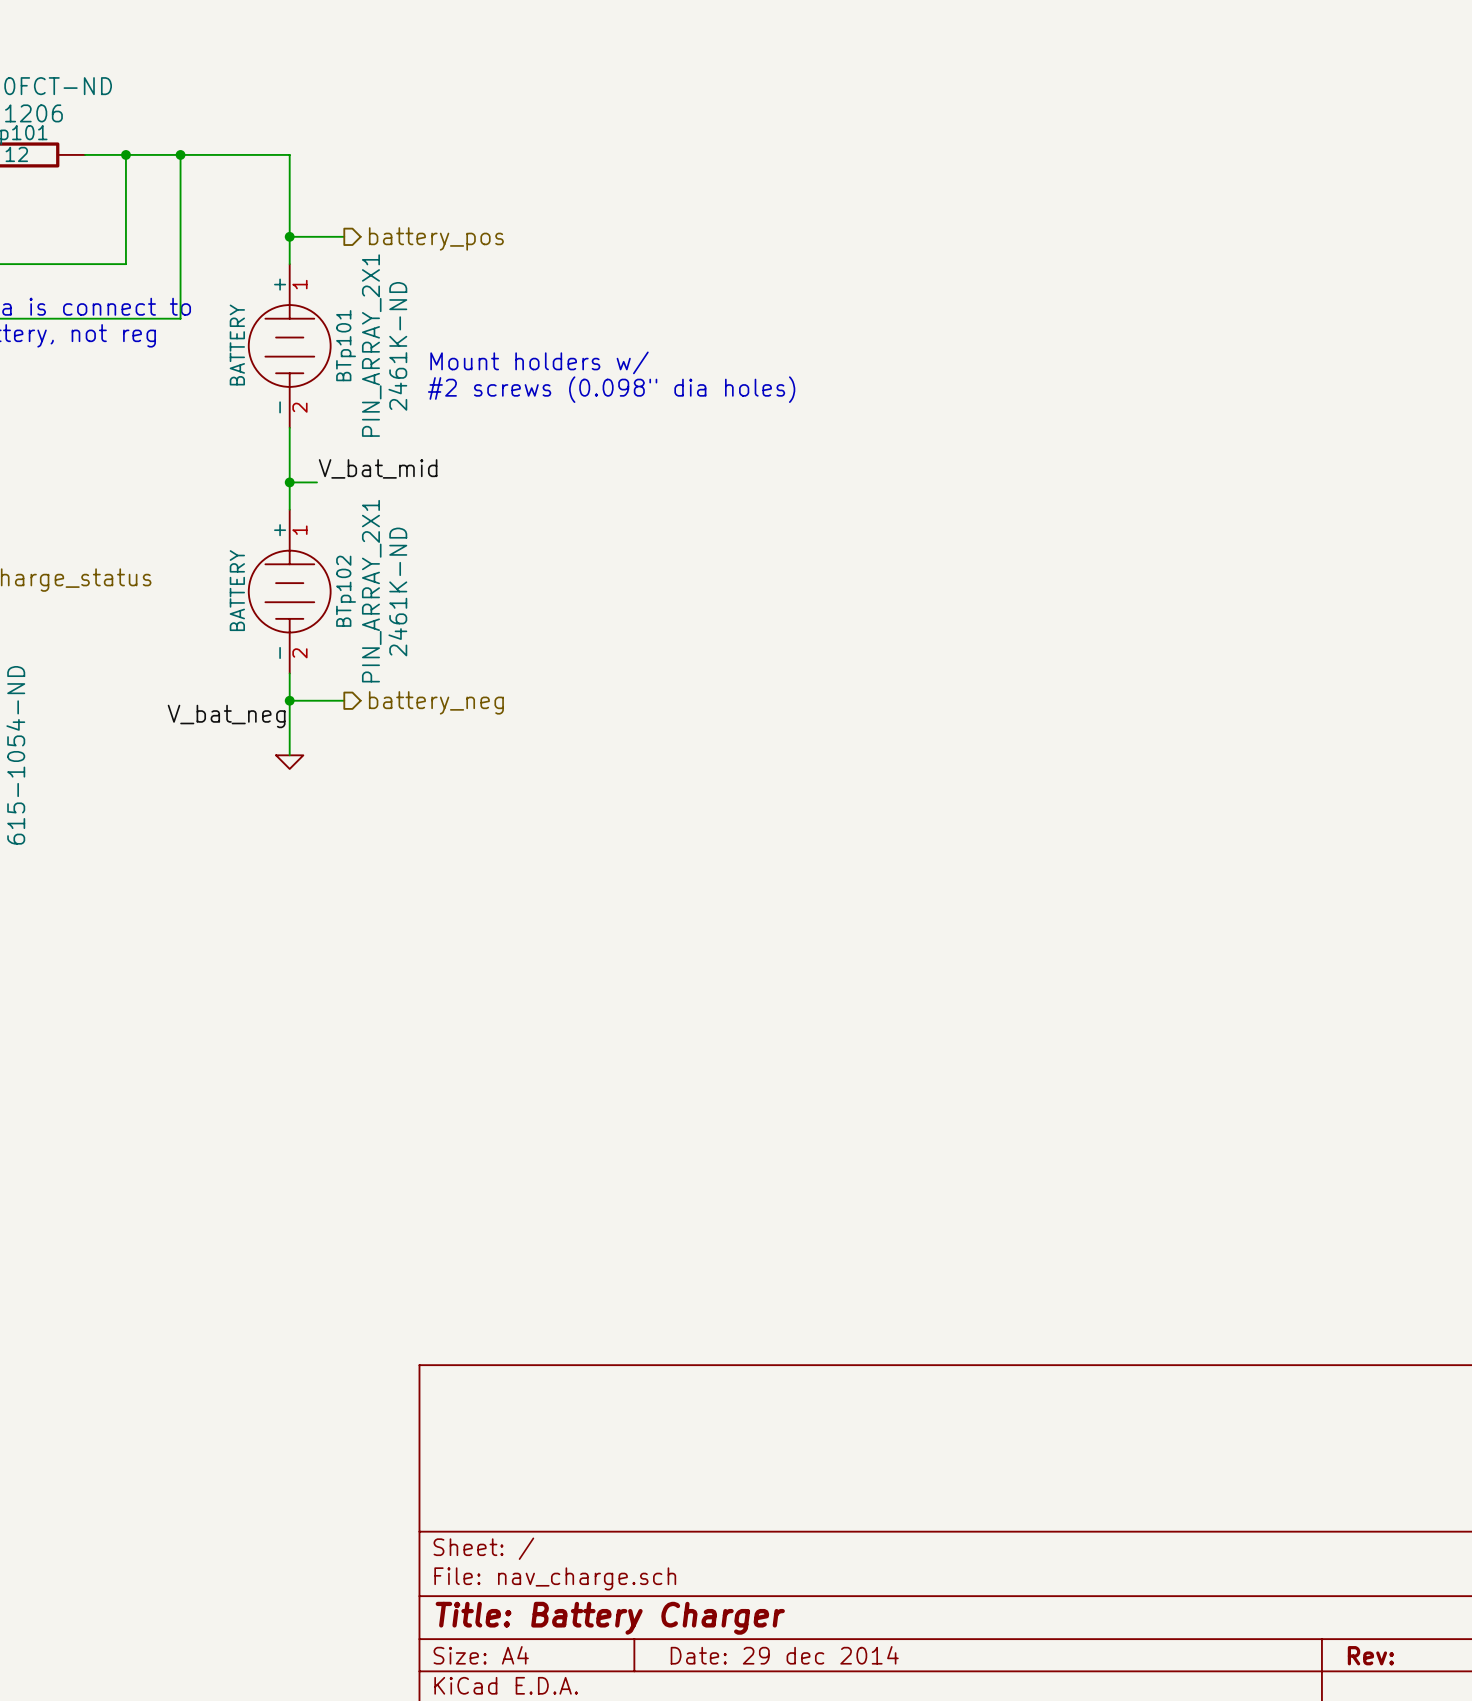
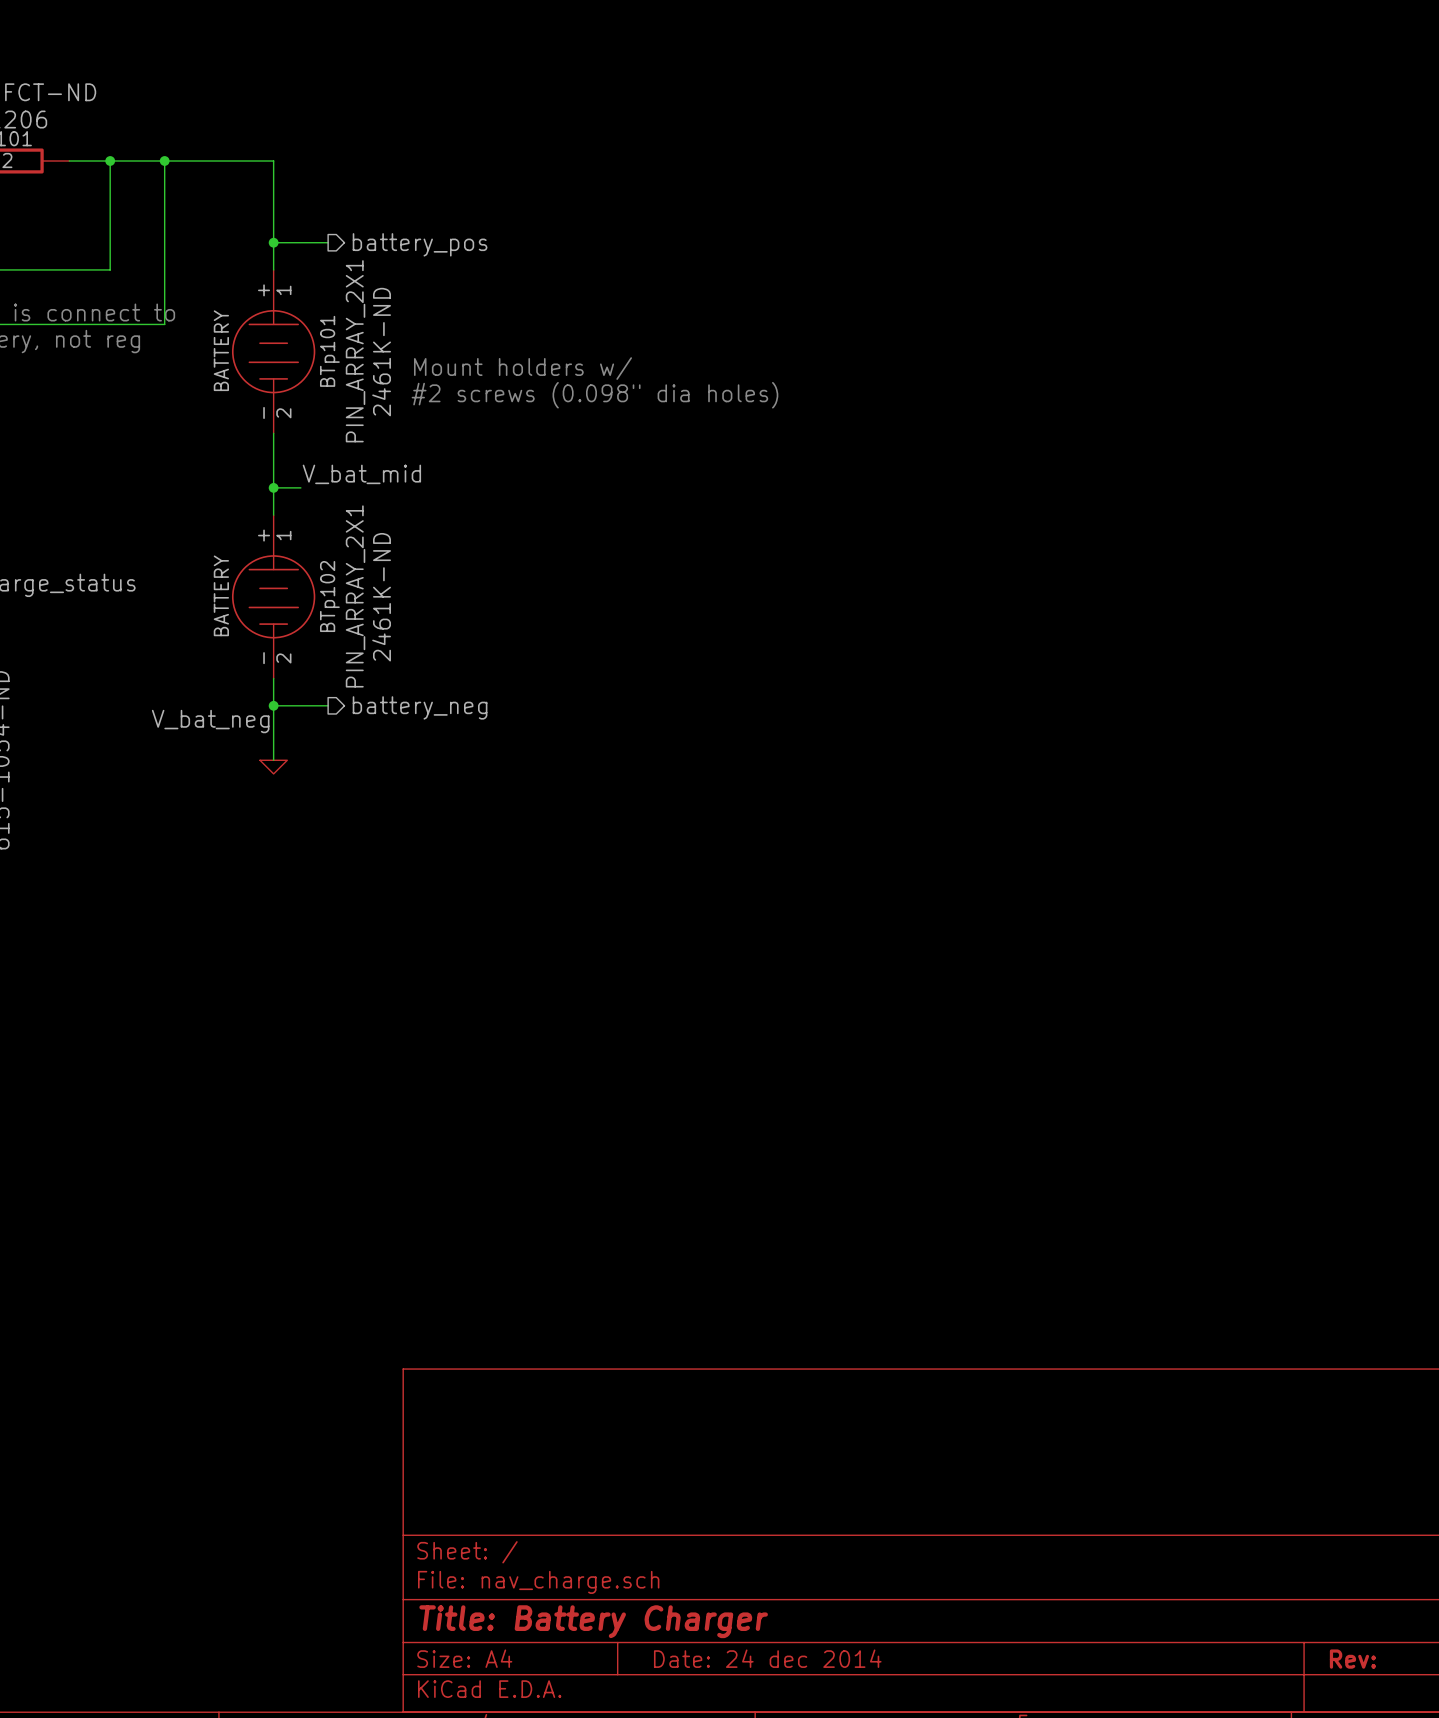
title block: Date: 29 dec 2014 (784, 1655) -> Date: 24 dec 2014 (767, 1658)

